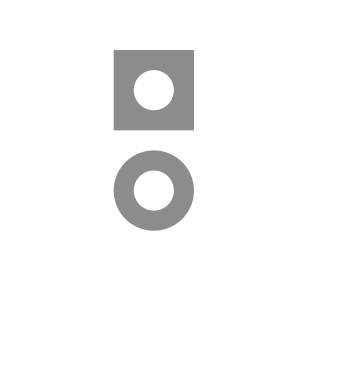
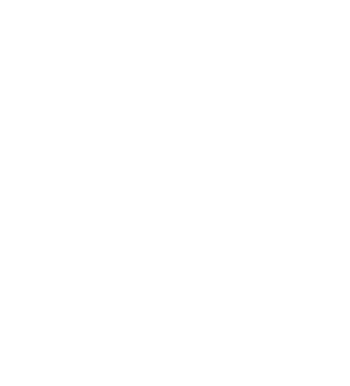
part: (153, 140) -> none

